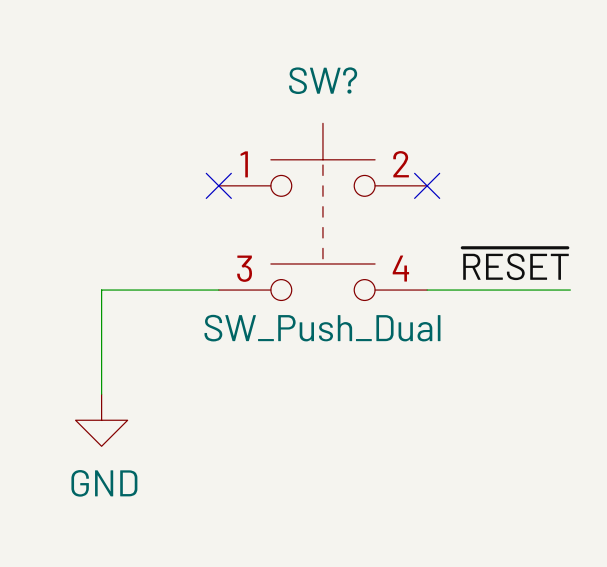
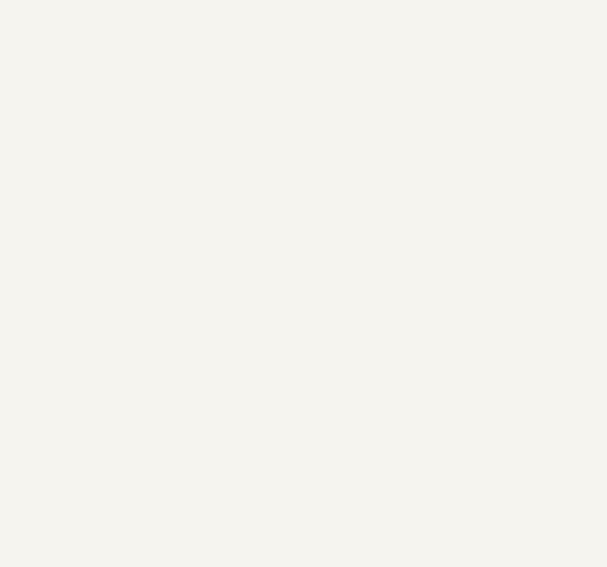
no-connect mark: (218, 185) -> none
no-connect mark: (427, 185) -> none
SW?: SW_Push_Dual (322, 211) -> none
label: ~{RESET} (515, 263) -> none
wire: (218, 290) (101, 290) (101, 394) -> none
wire: (427, 290) (570, 290) -> none
power symbol: GND (101, 420) -> none

